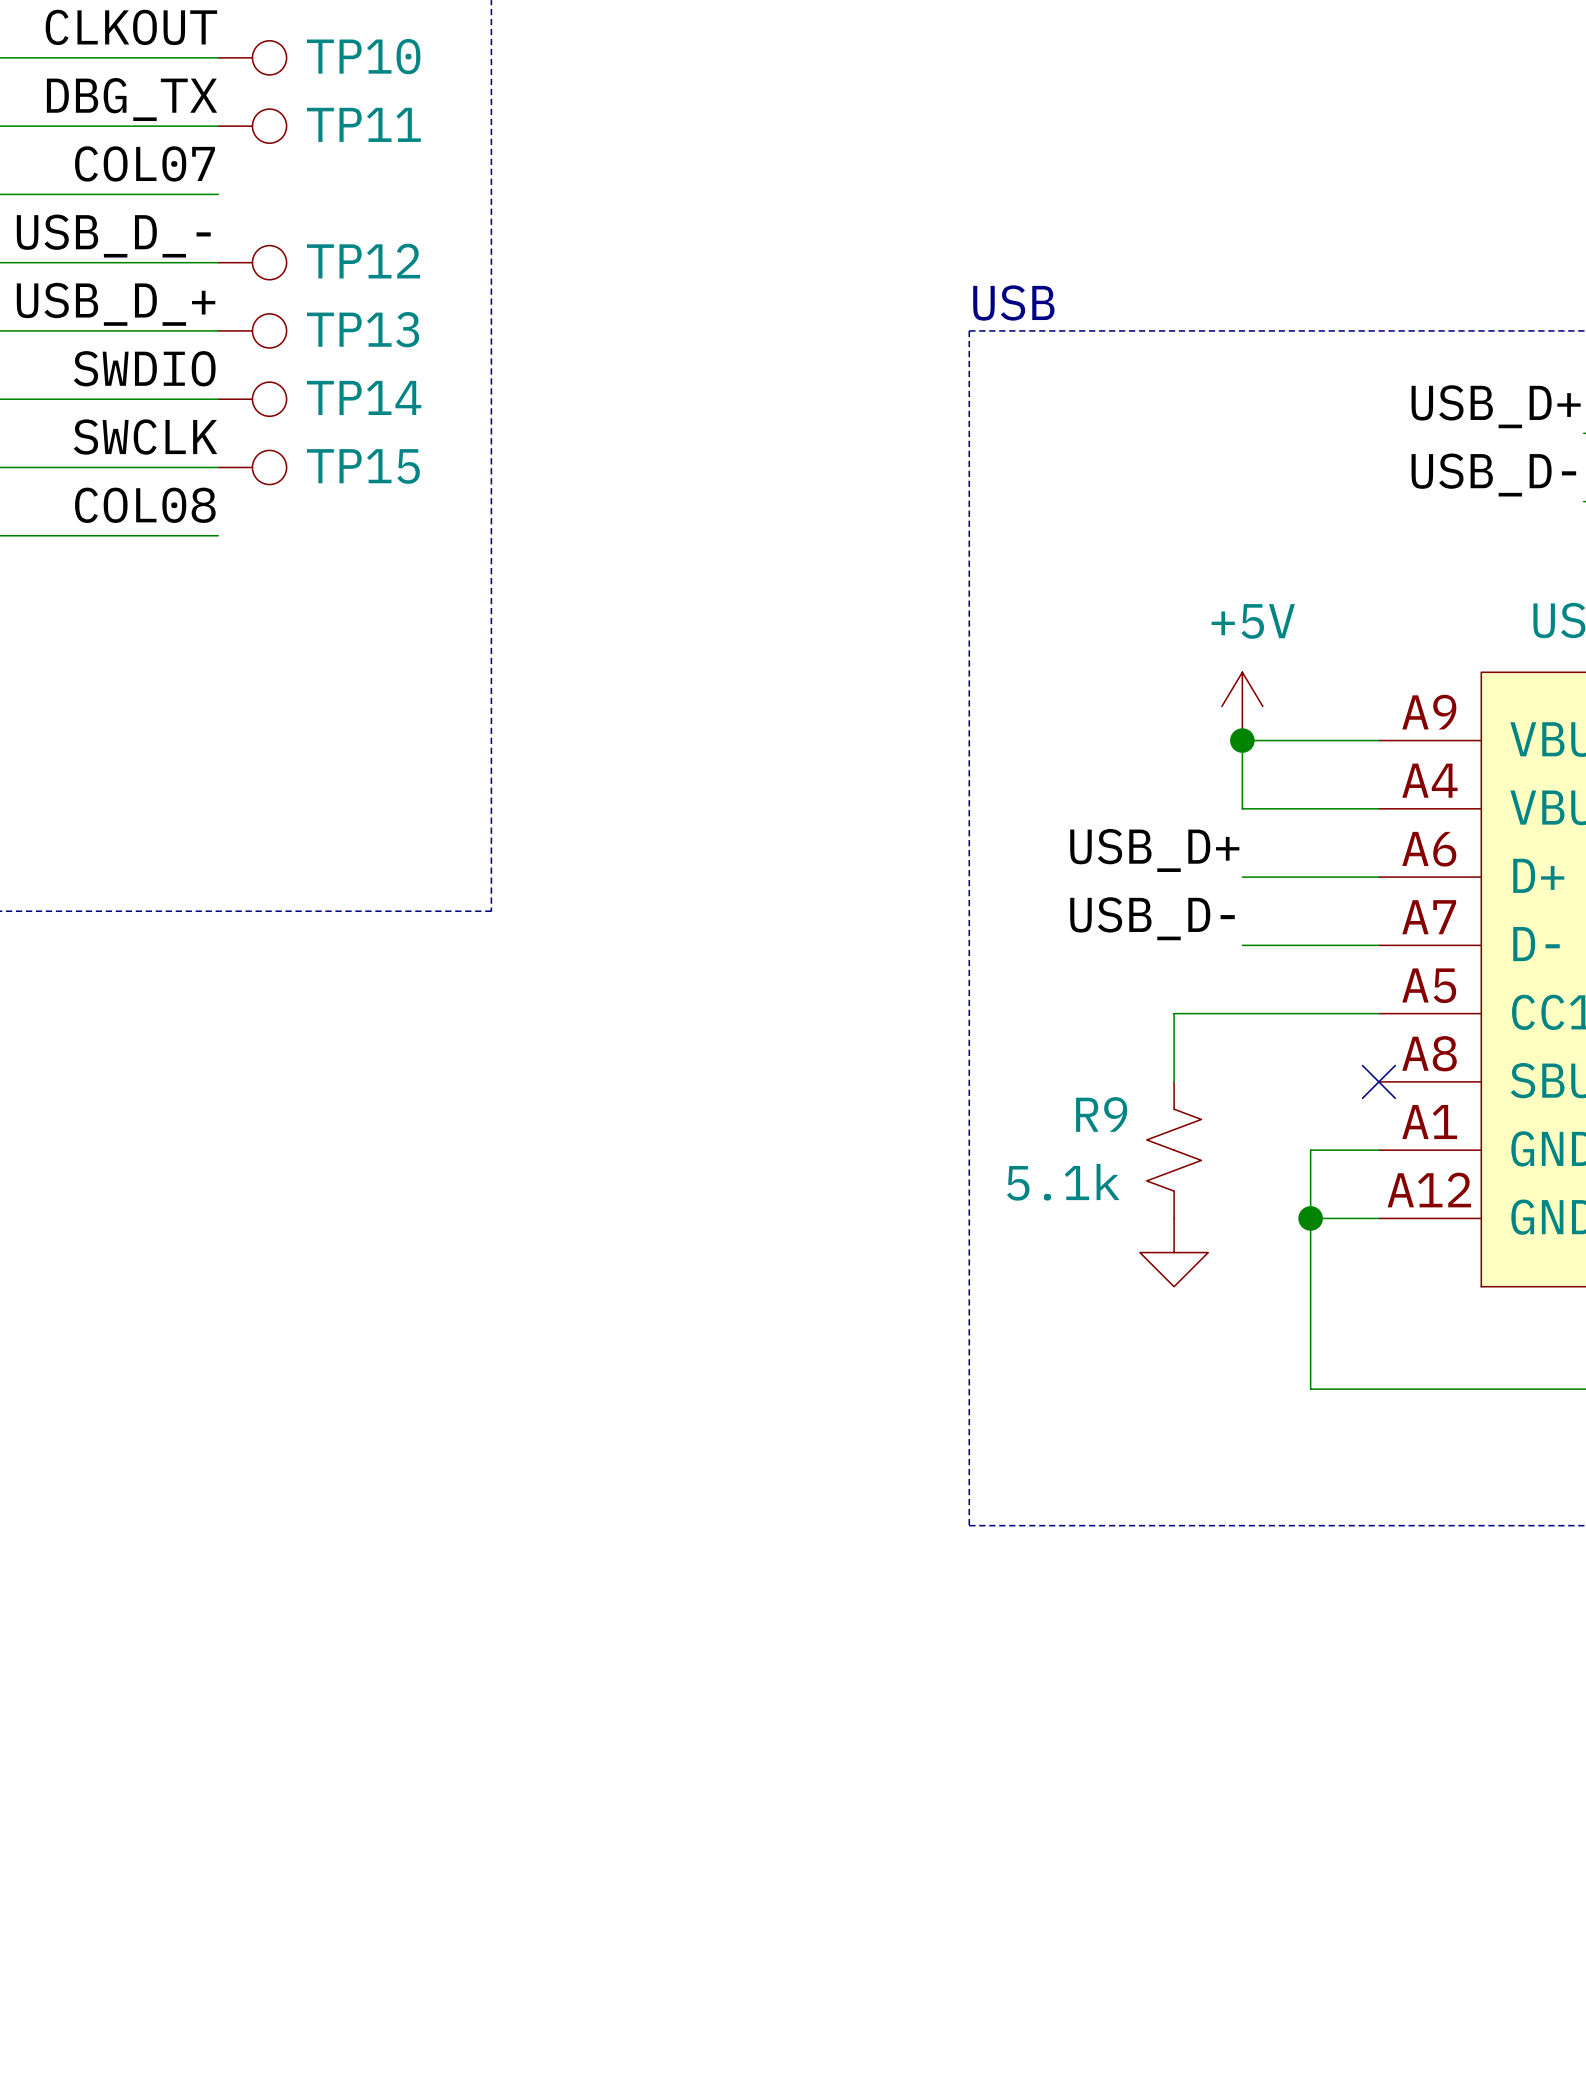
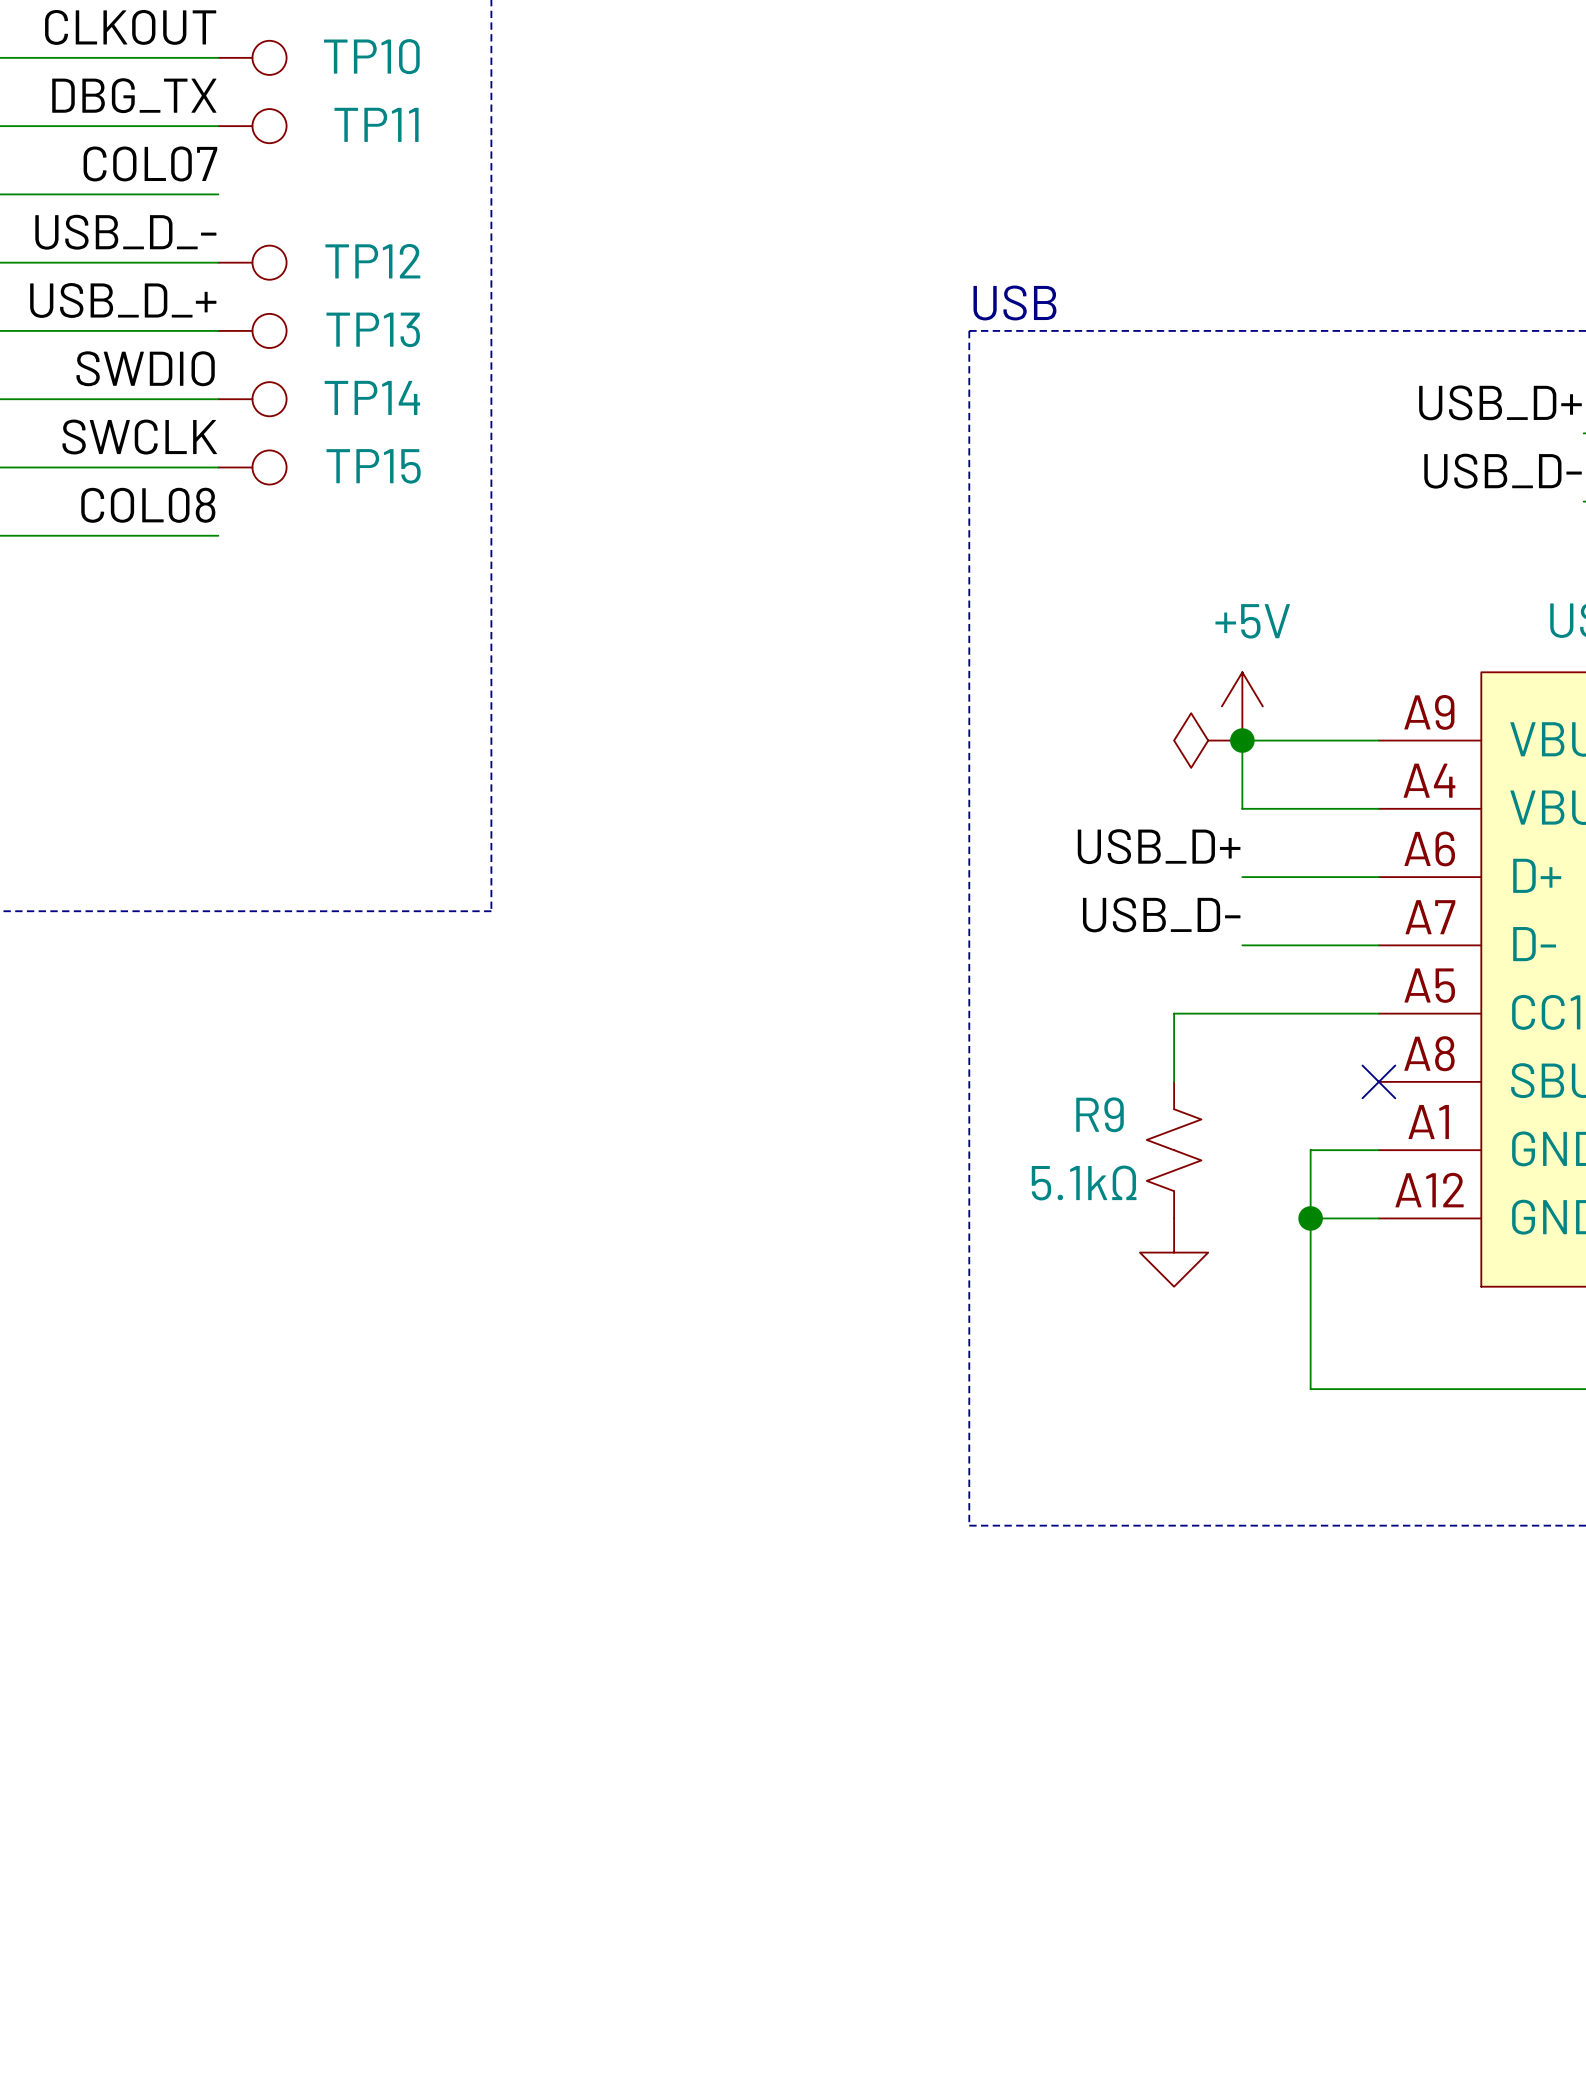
power symbol: none -> (1208, 740)
R9 value: 5.1k (1063, 1182) -> 5.1kΩ (1084, 1183)

